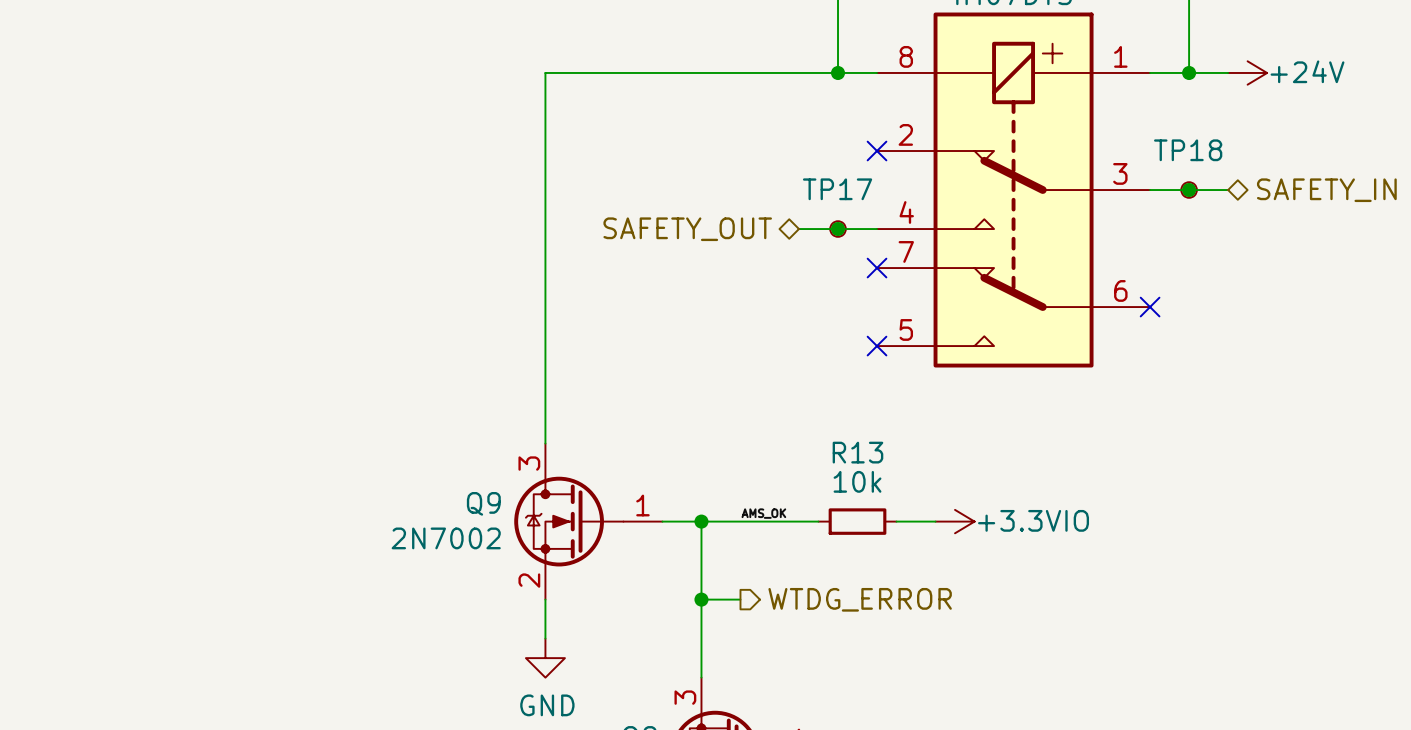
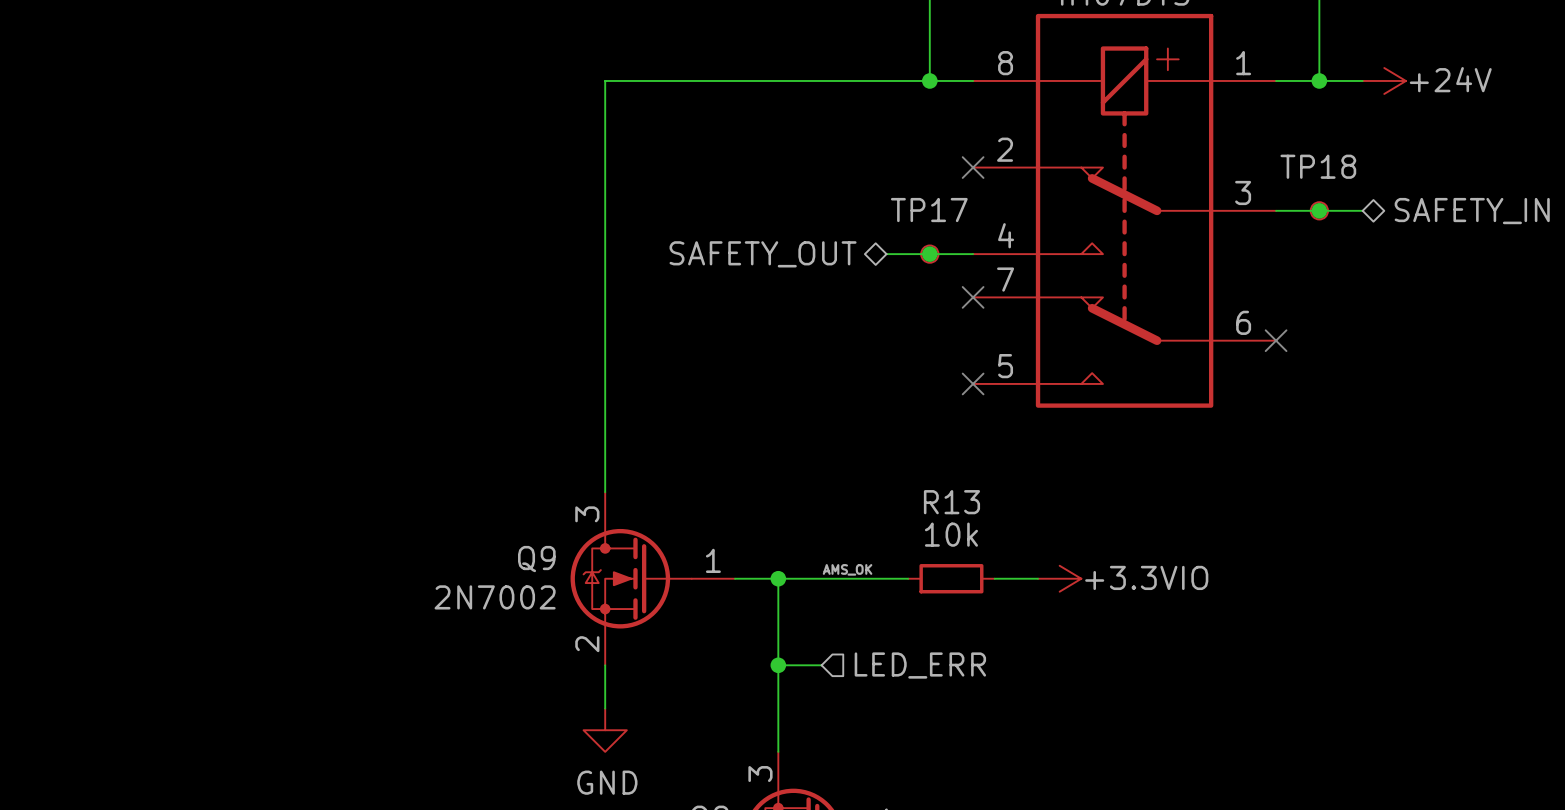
hierarchical label shape: output (860, 599) -> input (920, 665)
hierarchical label: WTDG_ERROR (860, 599) -> LED_ERR (920, 665)

